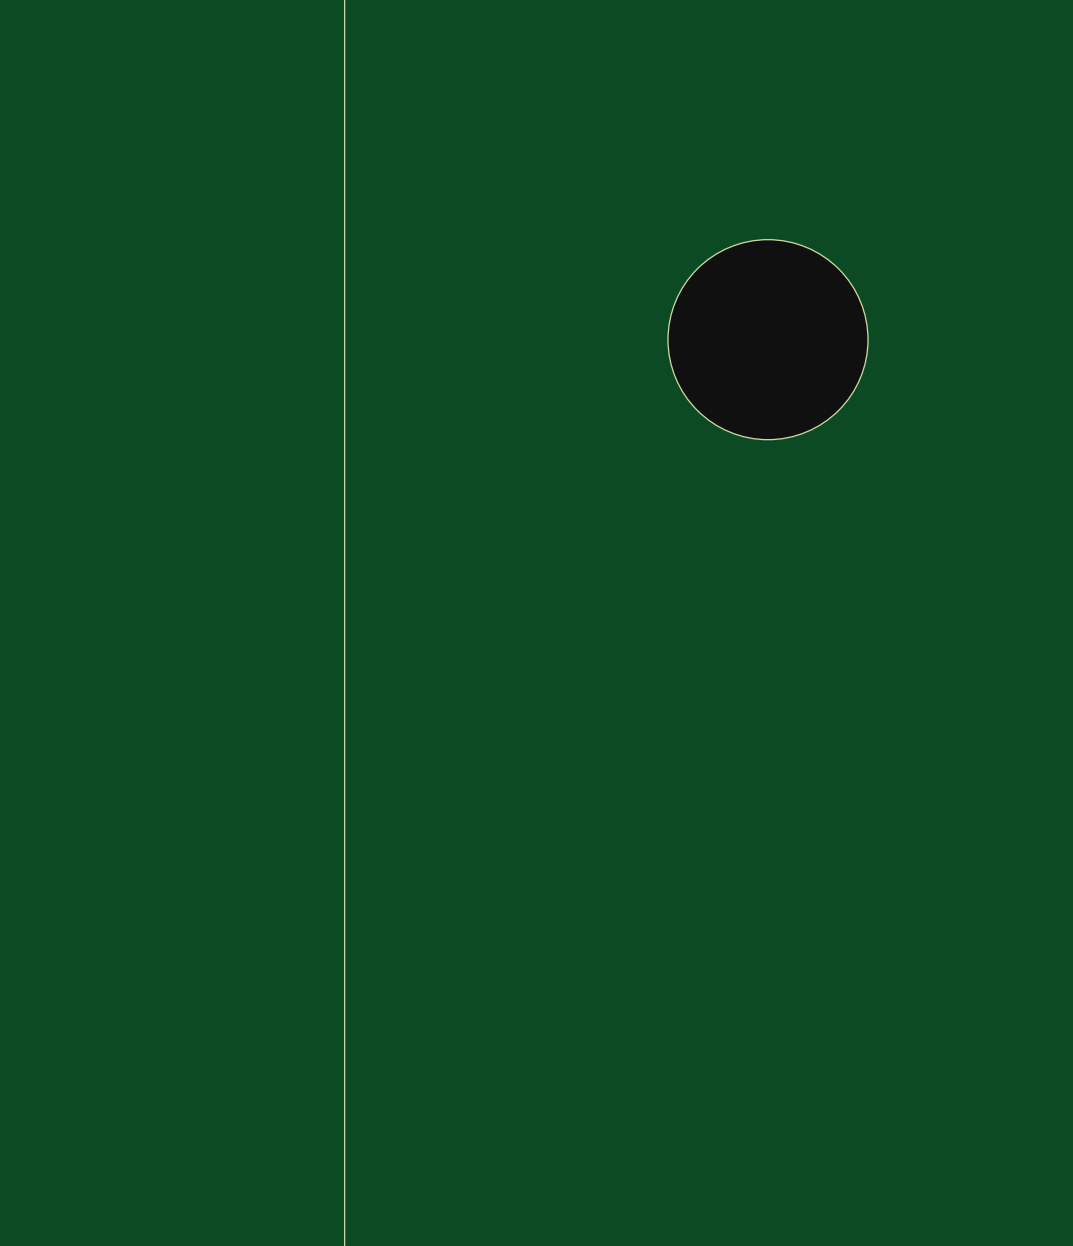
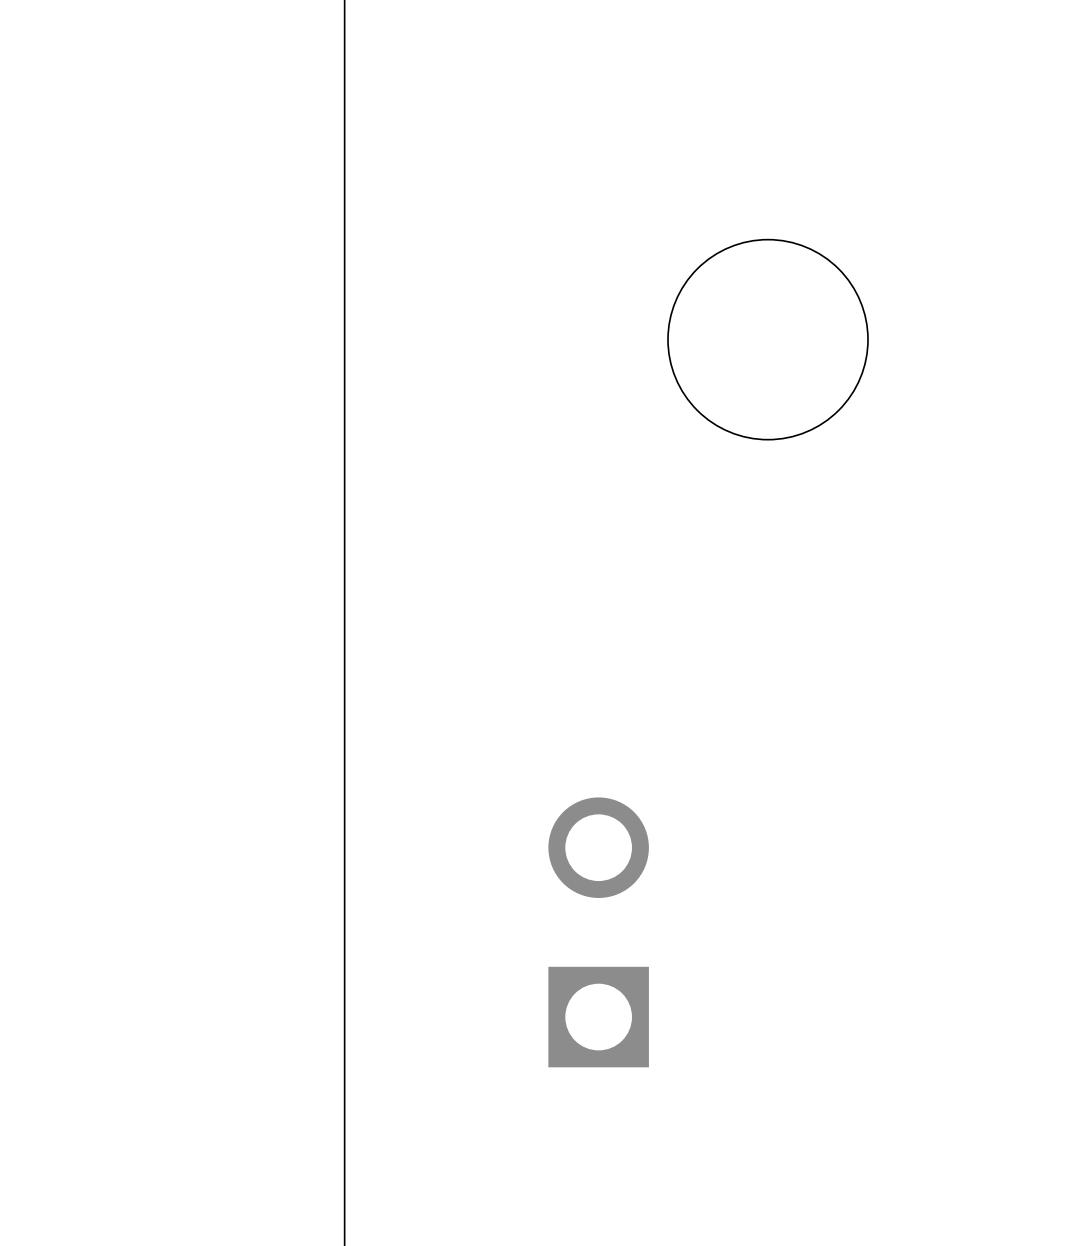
part: none -> (598, 932)

